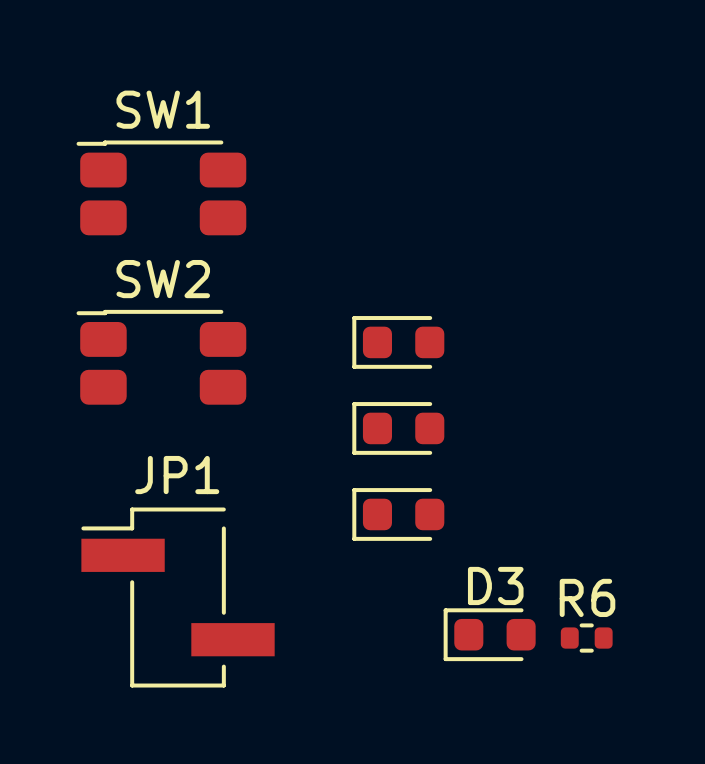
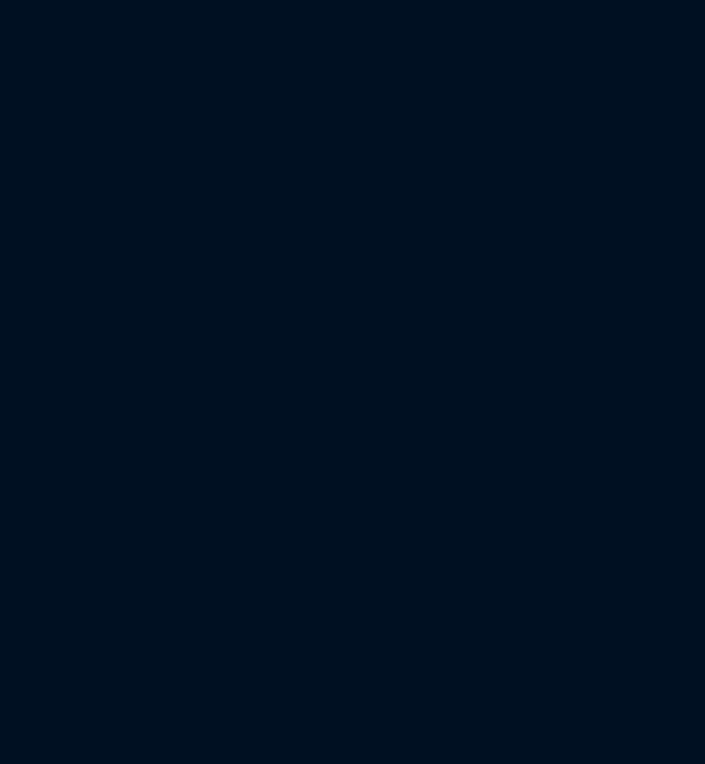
SW1: (161, 187) -> none
part: (398, 342) -> none
SW2: (161, 357) -> none
part: (398, 428) -> none
part: (398, 514) -> none
JP1: (178, 597) -> none
D3: (489, 634) -> none
R6: (586, 638) -> none

